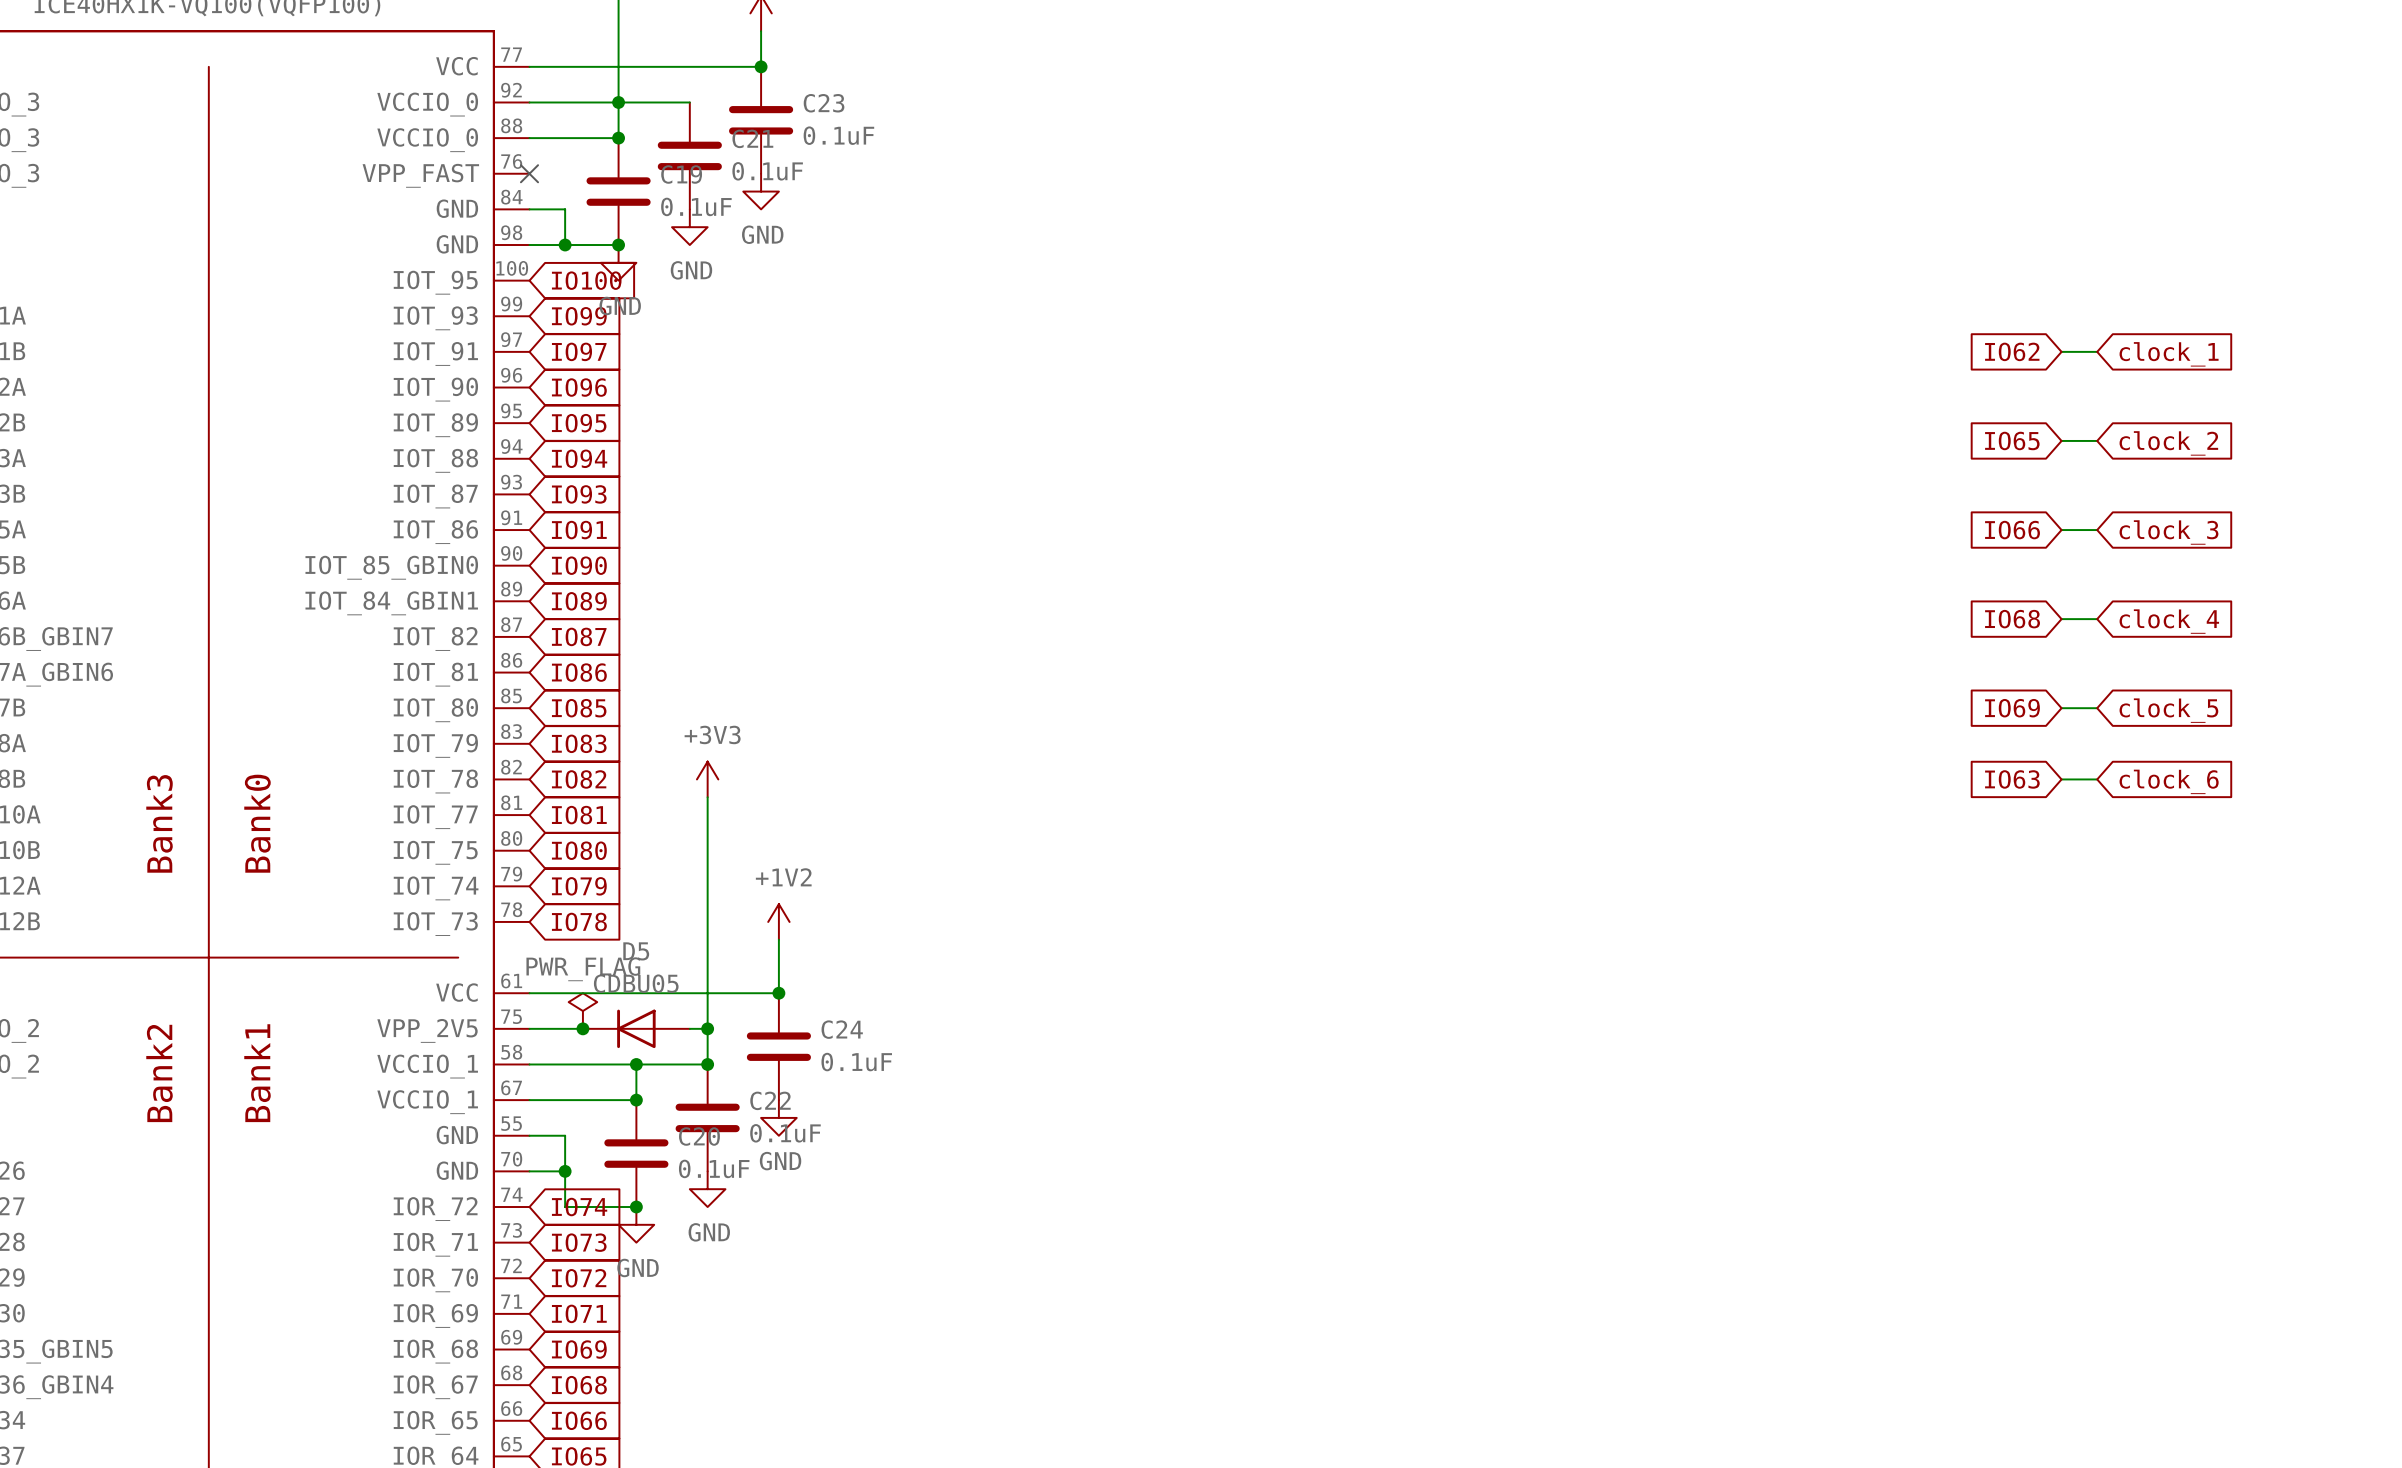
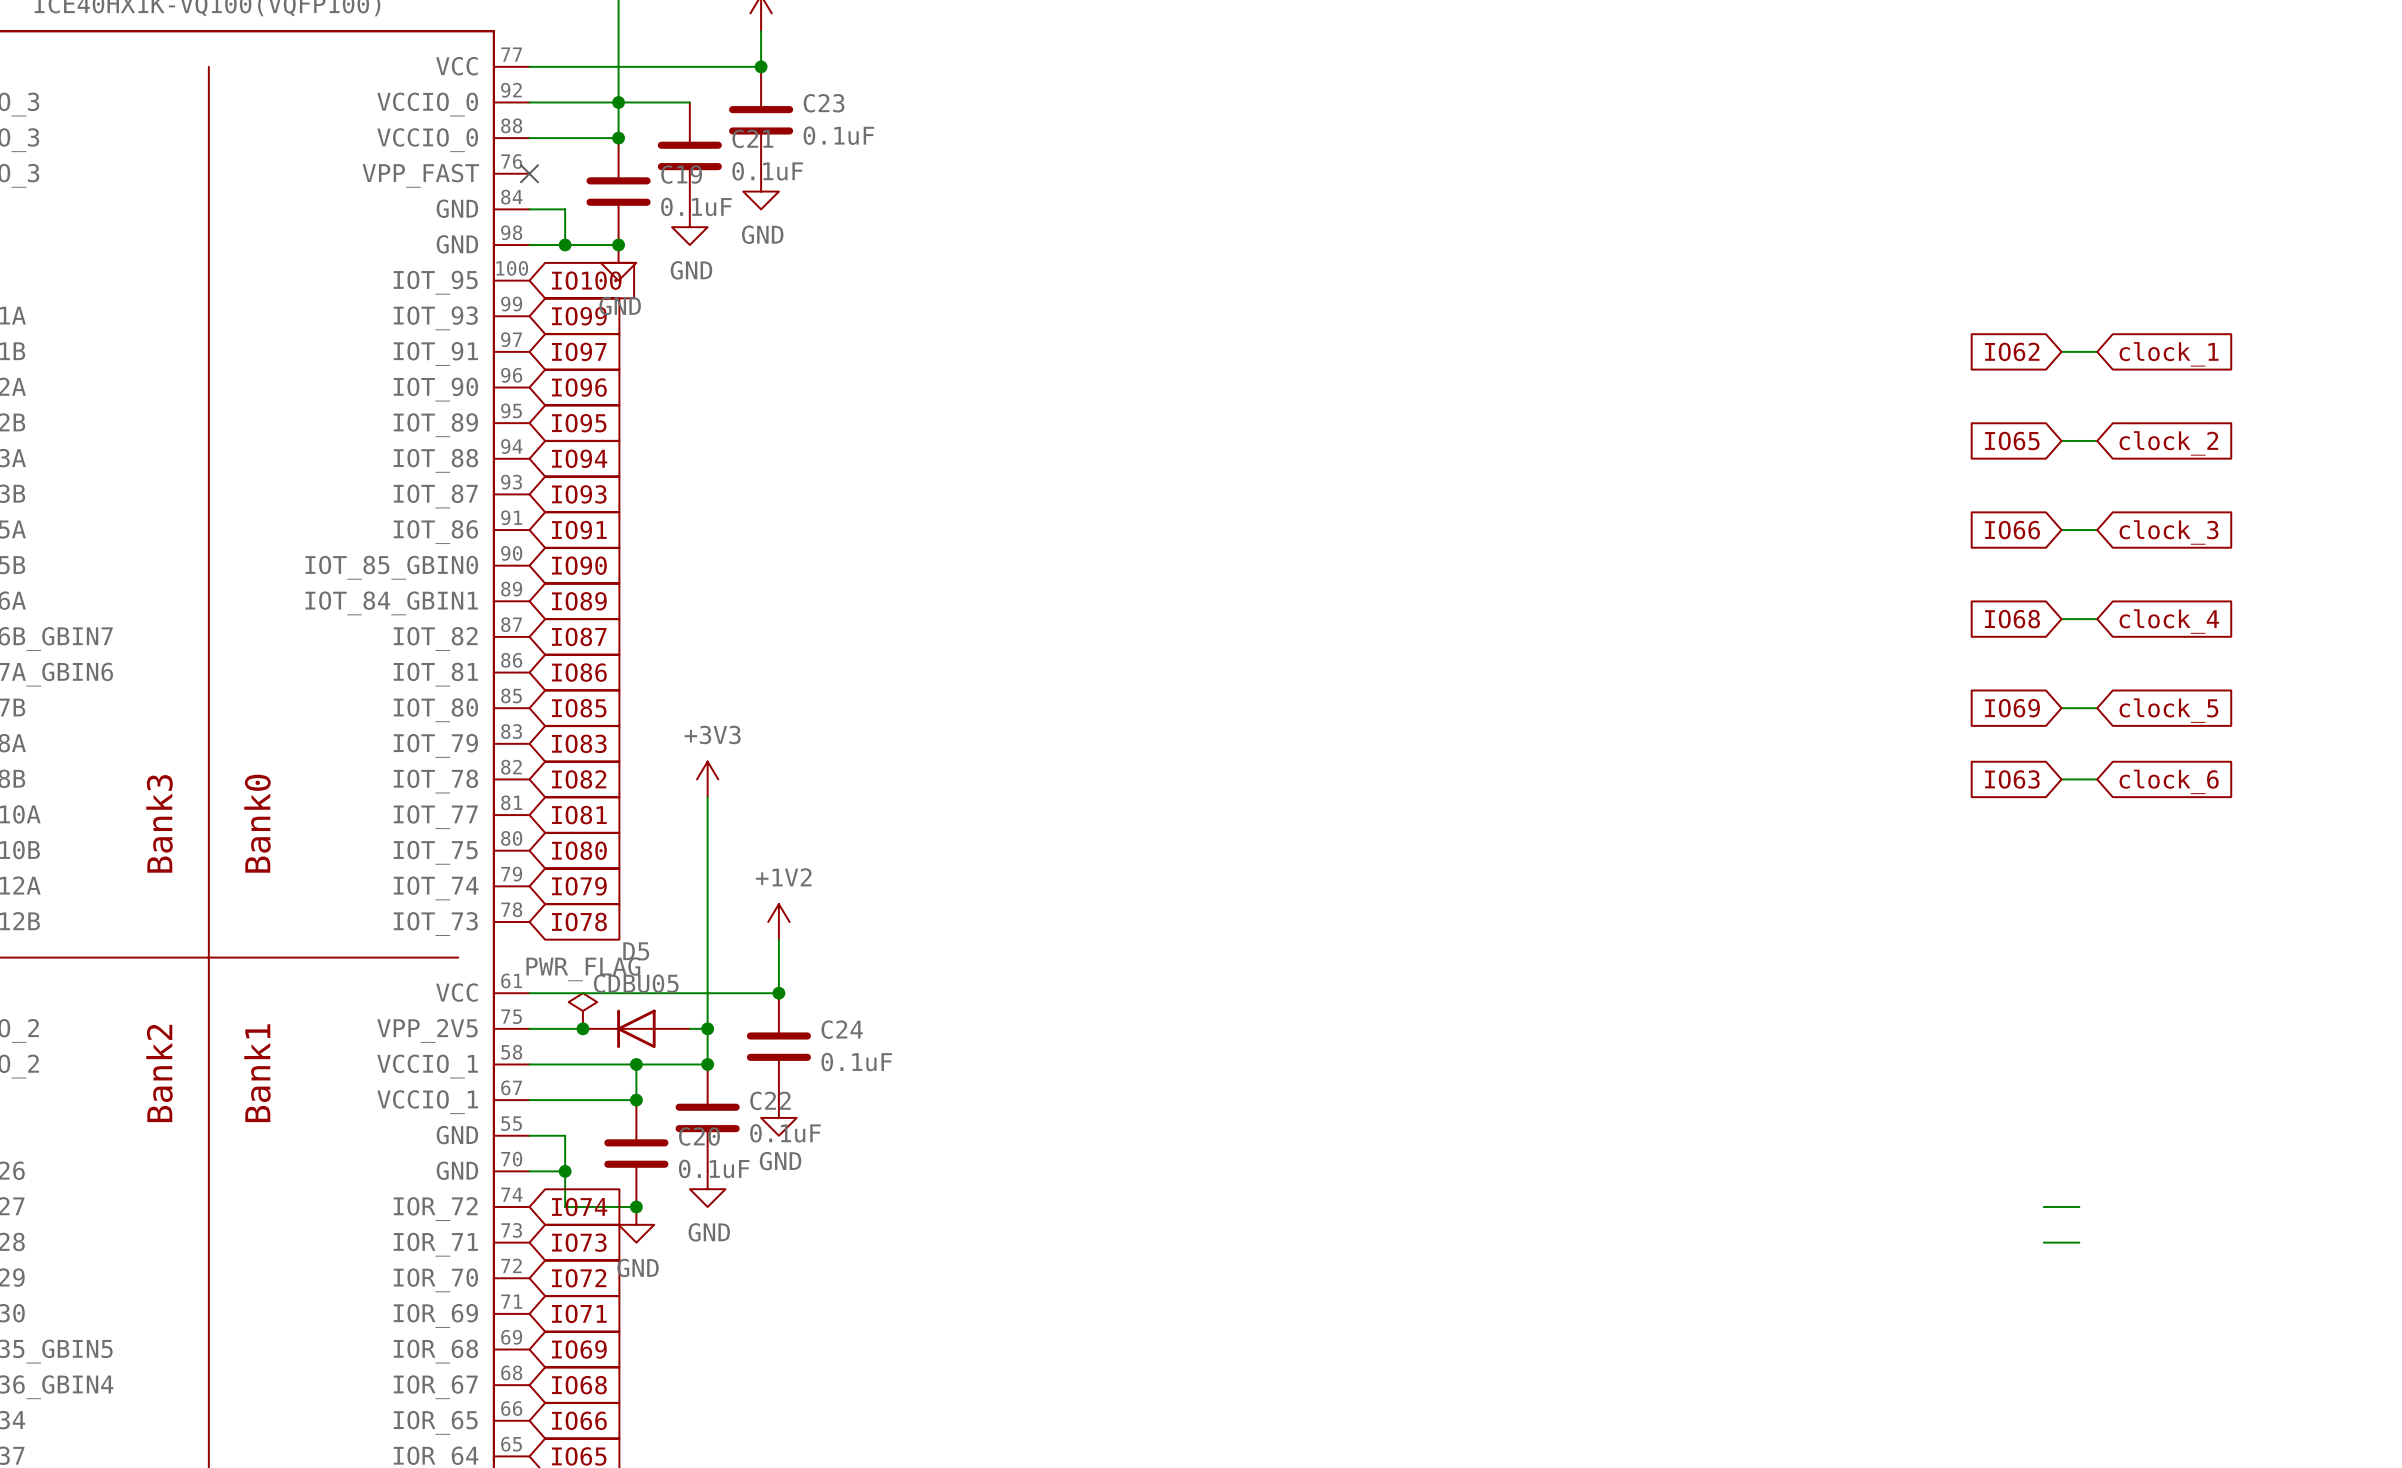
wire: none -> (2043, 1207) (2079, 1207)
wire: none -> (2043, 1242) (2079, 1242)

